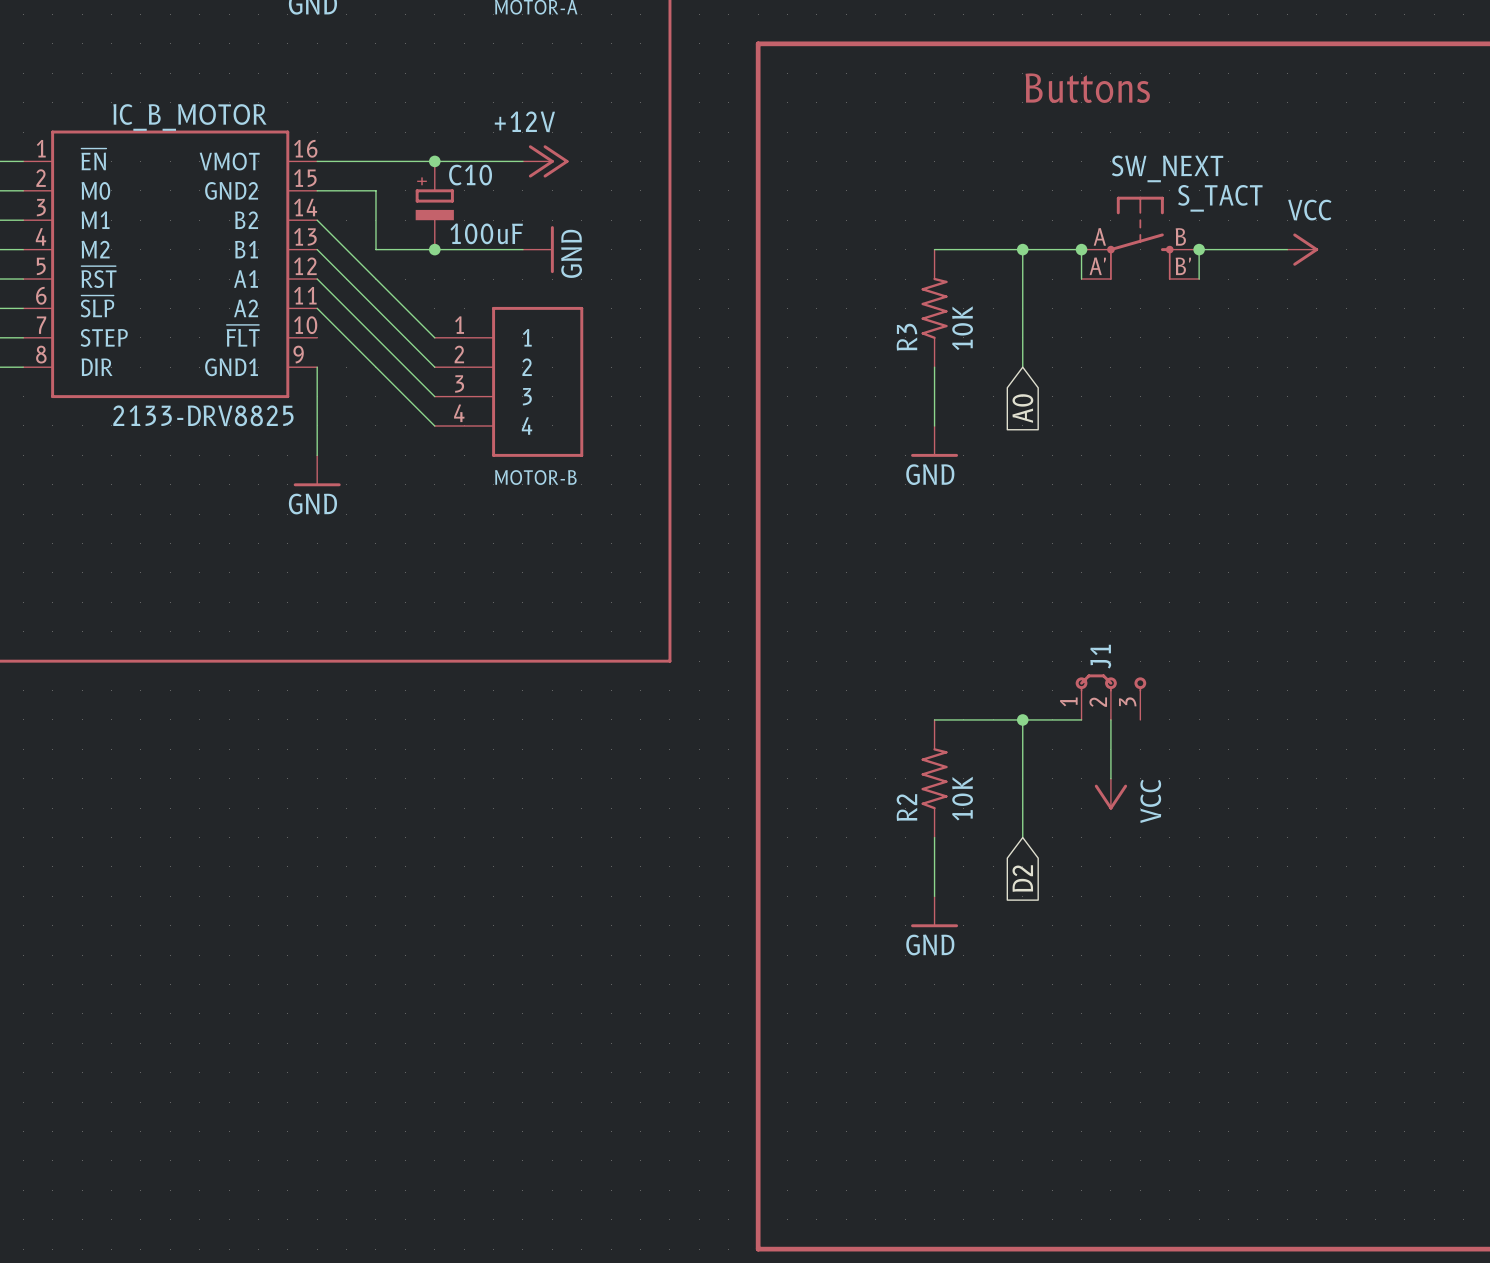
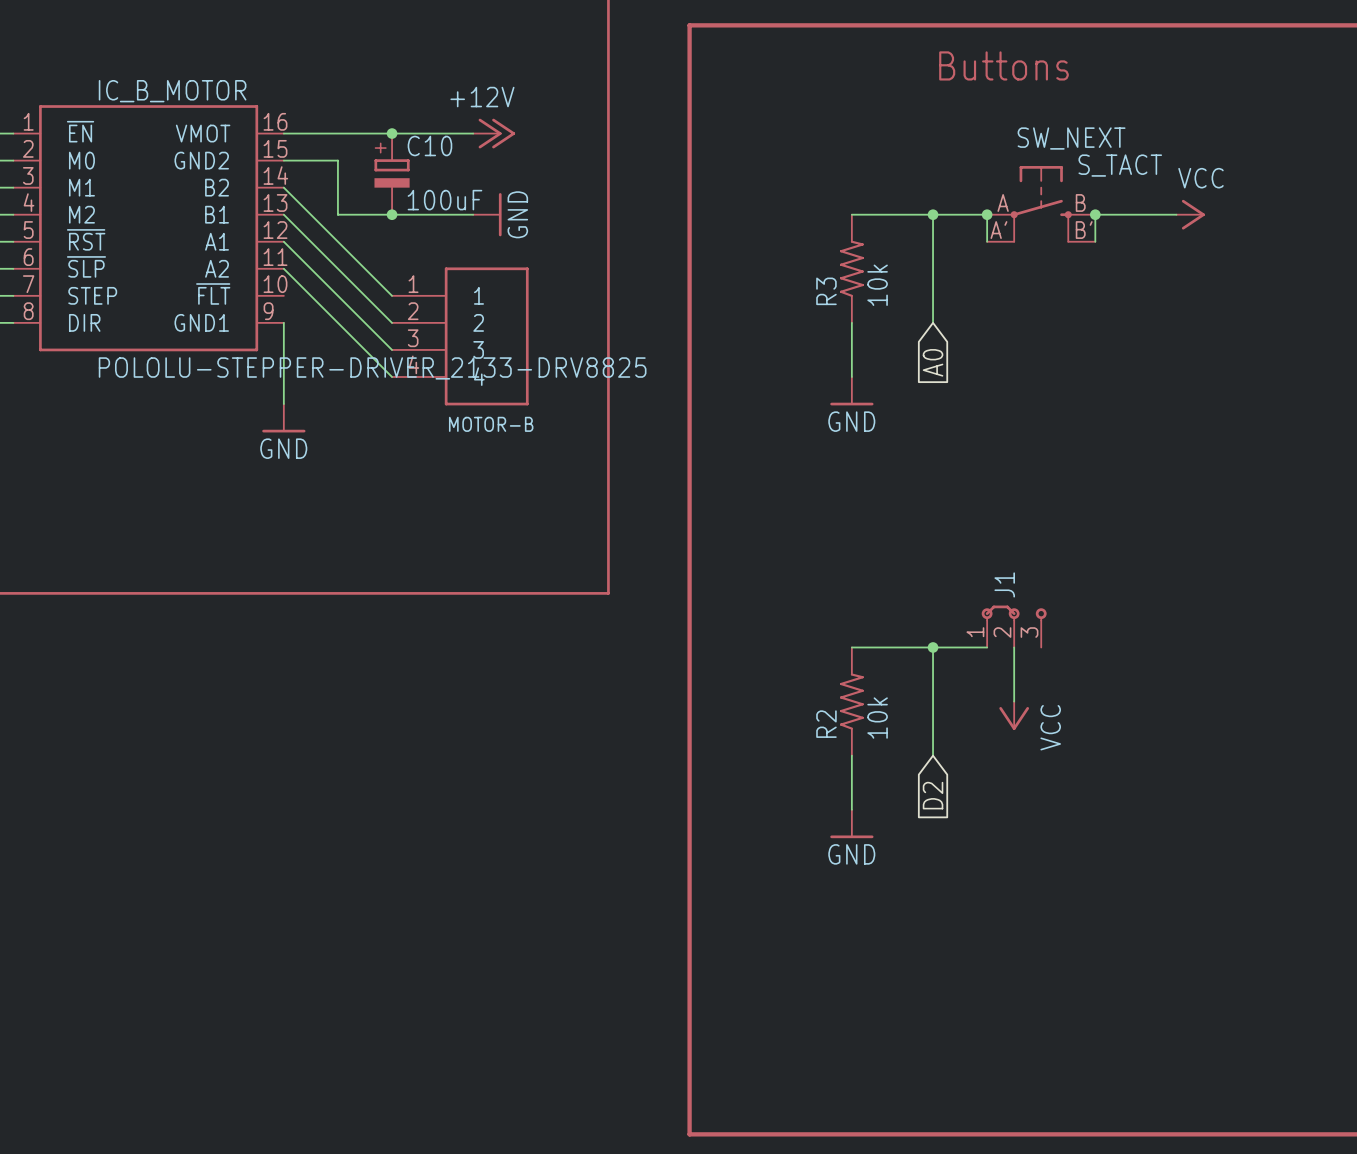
R3 value: 10K (962, 328) -> 10k (877, 285)
IC_B_MOTOR value: 2133-DRV8825 (203, 415) -> POLOLU-STEPPER-DRIVER_2133-DRV8825 (372, 368)
R2 value: 10K (962, 798) -> 10k (877, 718)

